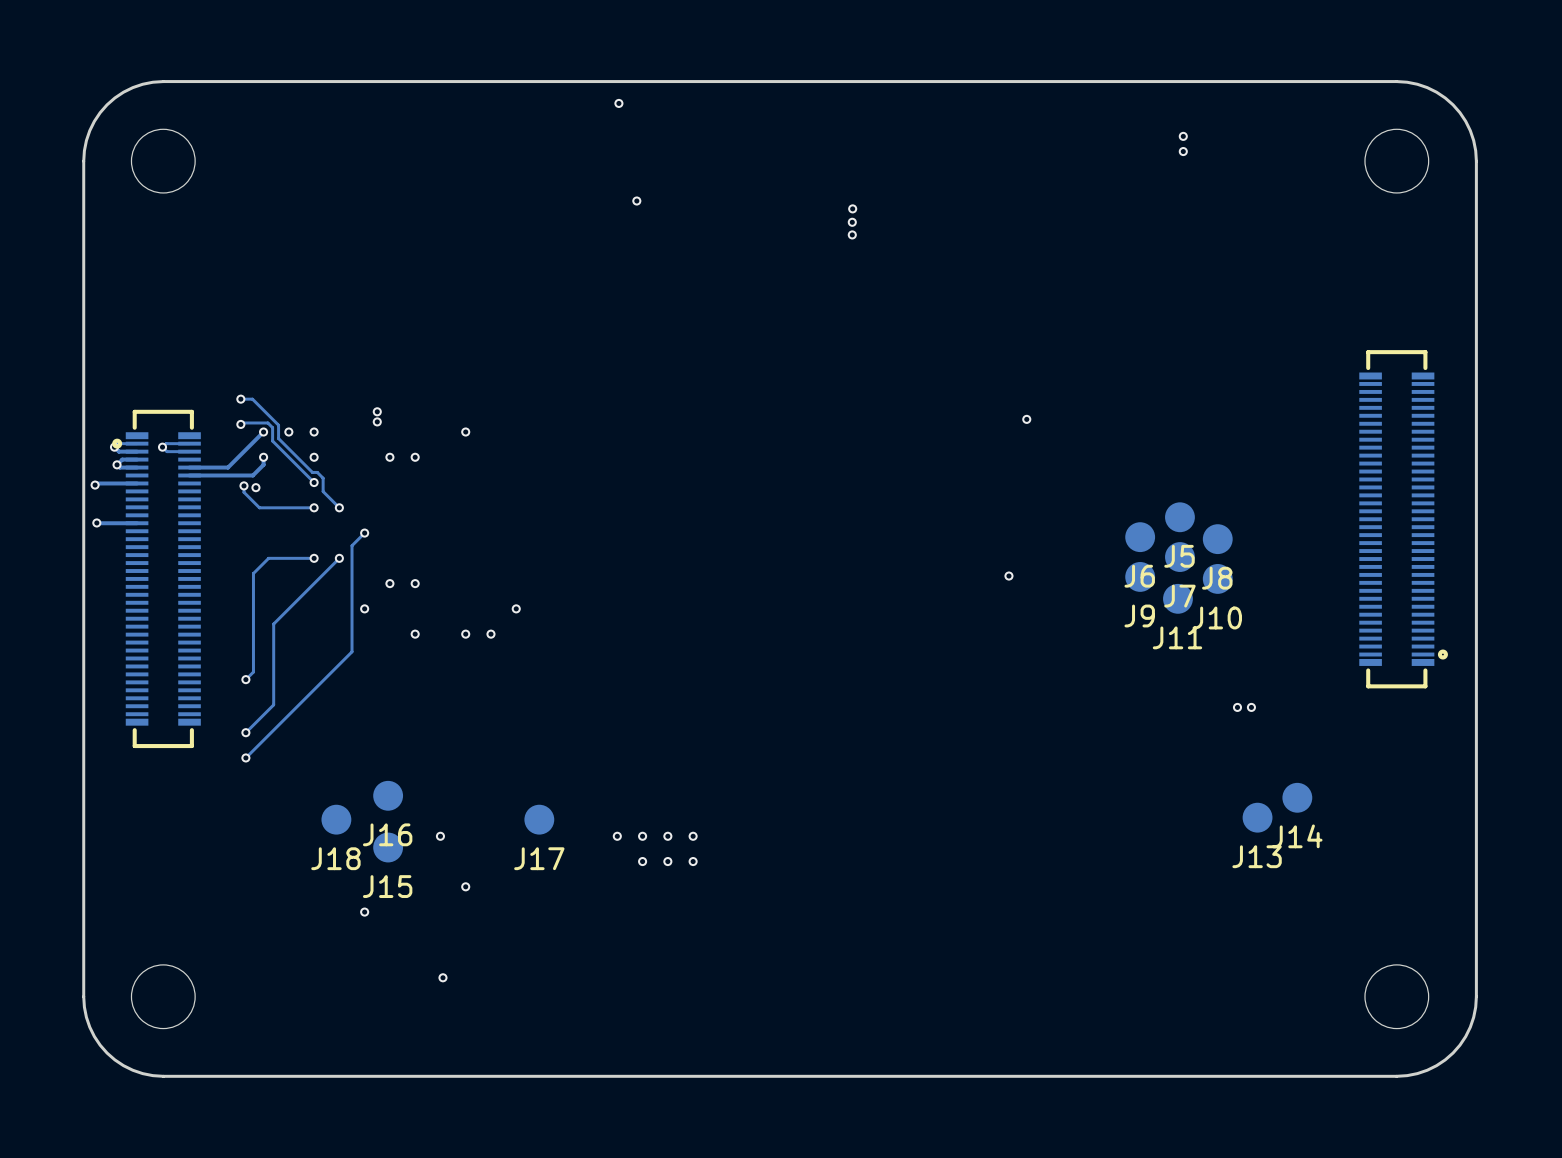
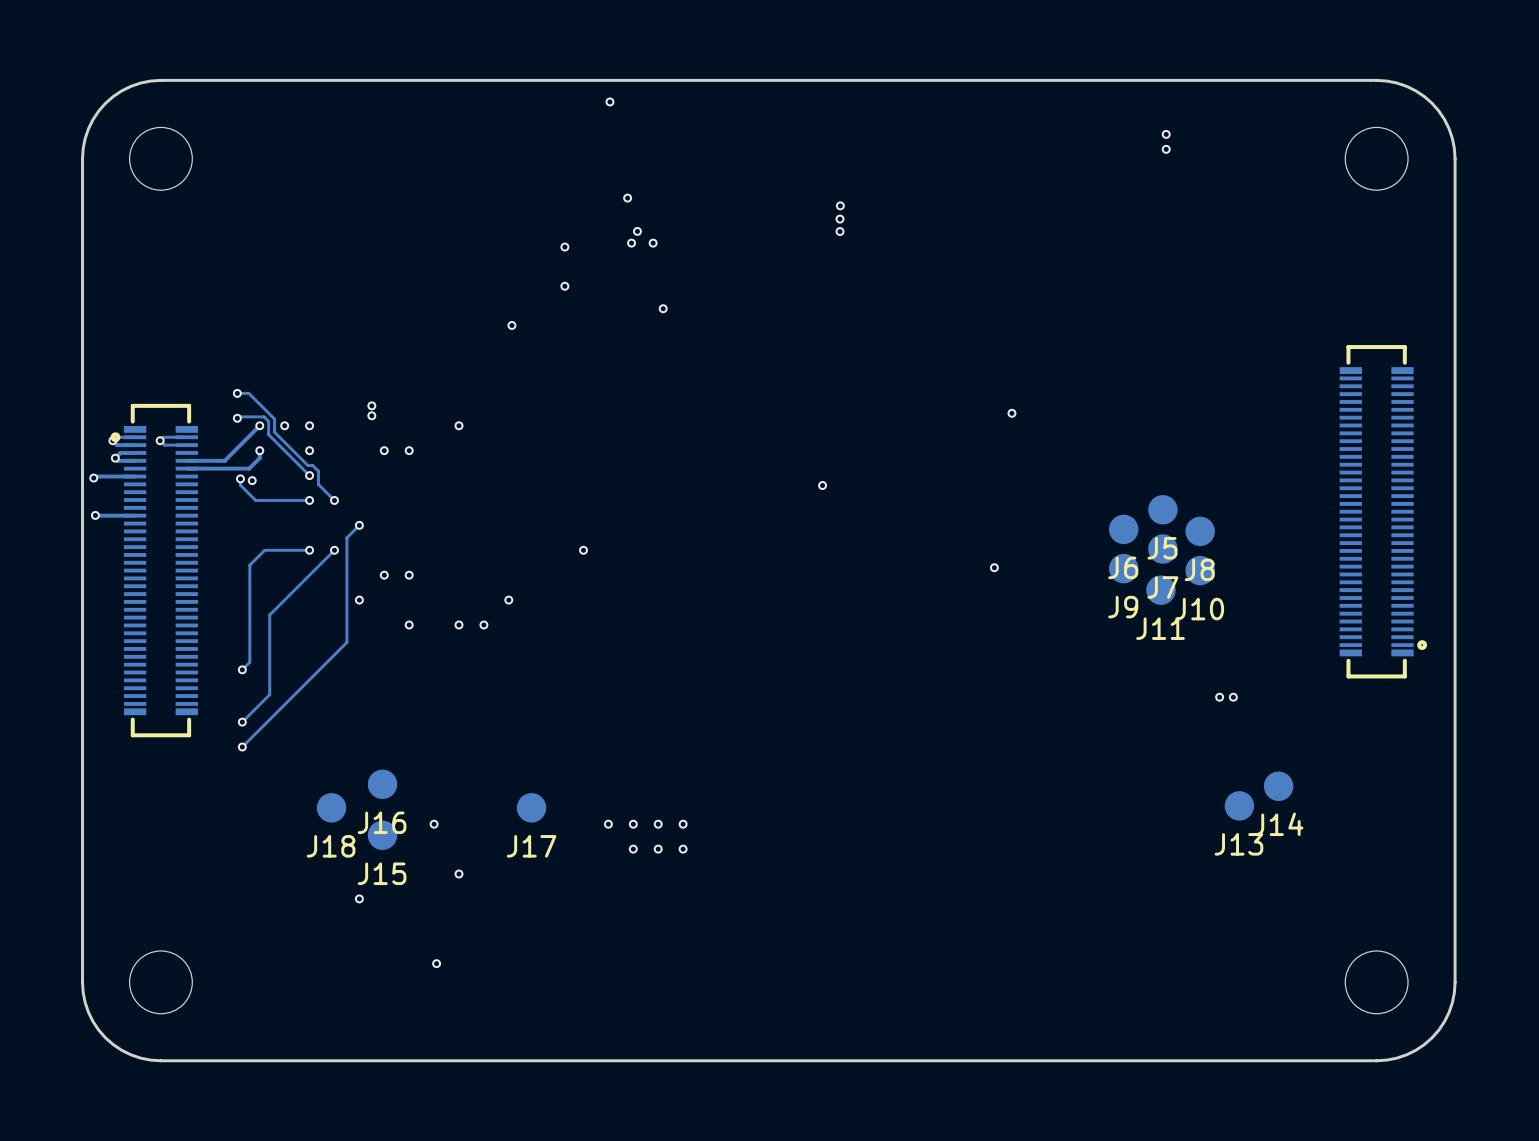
via: none -> (637, 231)
via: none -> (631, 243)
via: none -> (653, 243)
via: none -> (564, 247)
via: none -> (564, 286)
via: none -> (663, 308)
via: none -> (511, 325)
via: none -> (822, 485)
via: none -> (583, 550)

